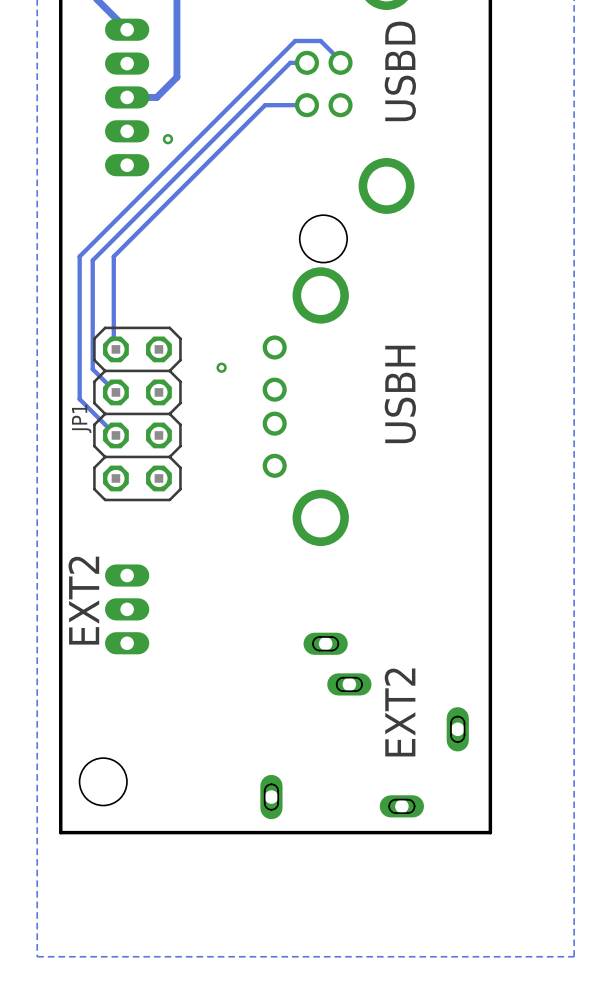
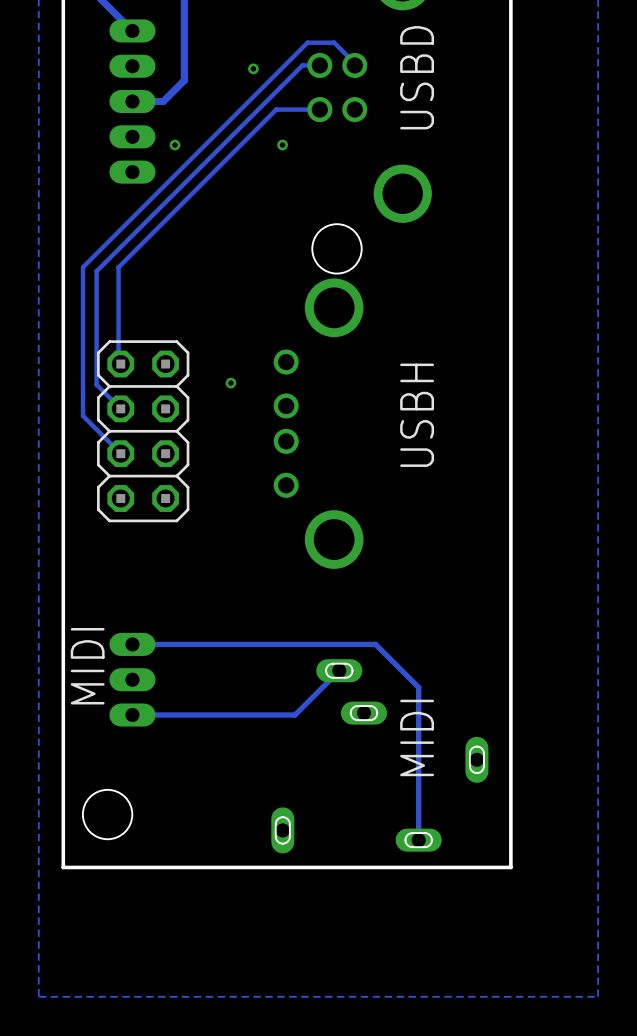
via: none -> (253, 68)
via: none -> (282, 145)
JP1 name: JP1 (81, 418) -> none
text: EXT2 (83, 600) -> none
part position: (127, 609) -> (132, 679)
track: none -> (132, 644) (375, 644) (418, 687) (418, 840)
text: none -> MIDI (87, 666)
track: none -> (339, 670) (294, 715) (132, 715)
text: EXT2 (400, 712) -> MIDI (417, 737)

